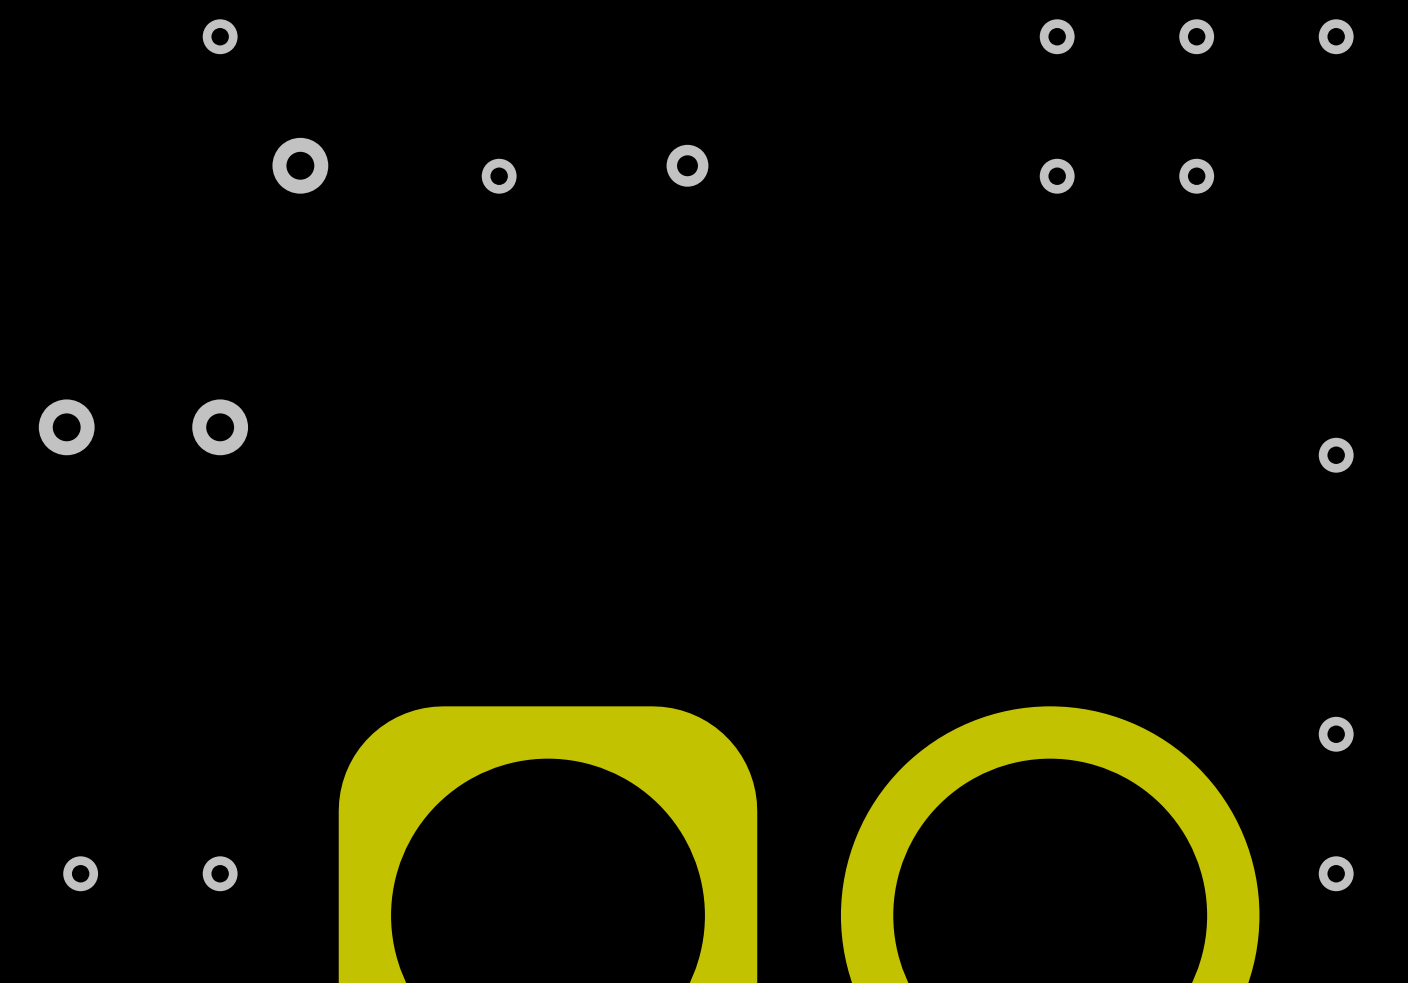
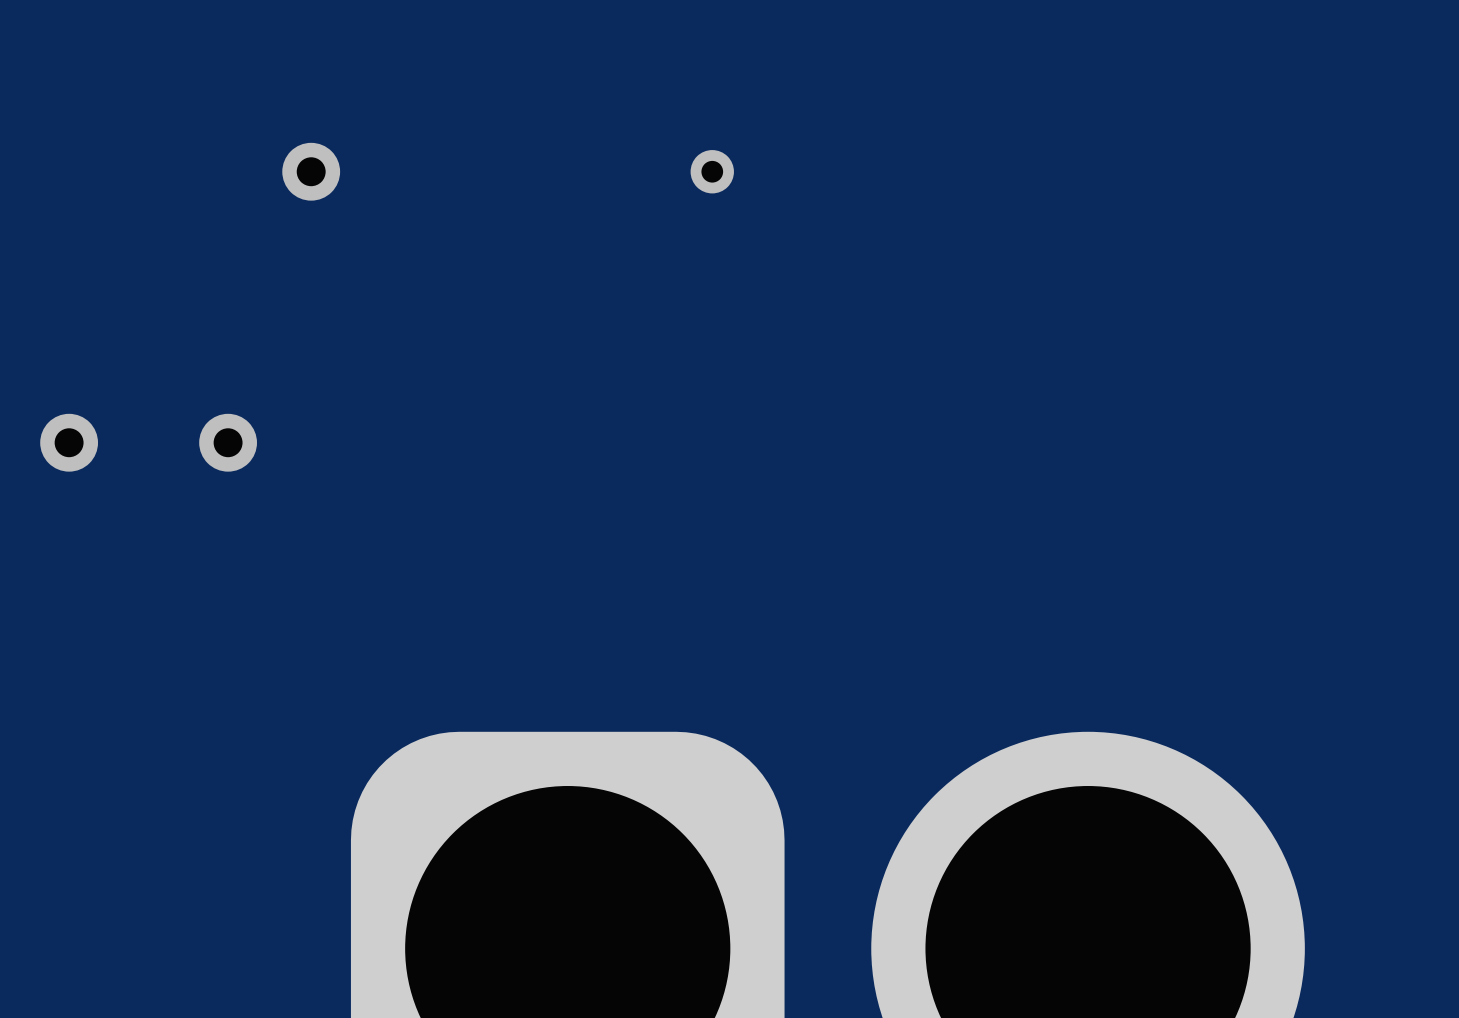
via: (220, 36) -> none
via: (1057, 36) -> none
via: (1196, 36) -> none
via: (1336, 36) -> none
via: (499, 176) -> none
via: (1057, 176) -> none
via: (1196, 176) -> none
via: (1336, 455) -> none
via: (1336, 734) -> none
via: (80, 873) -> none
via: (220, 873) -> none
via: (1336, 873) -> none

